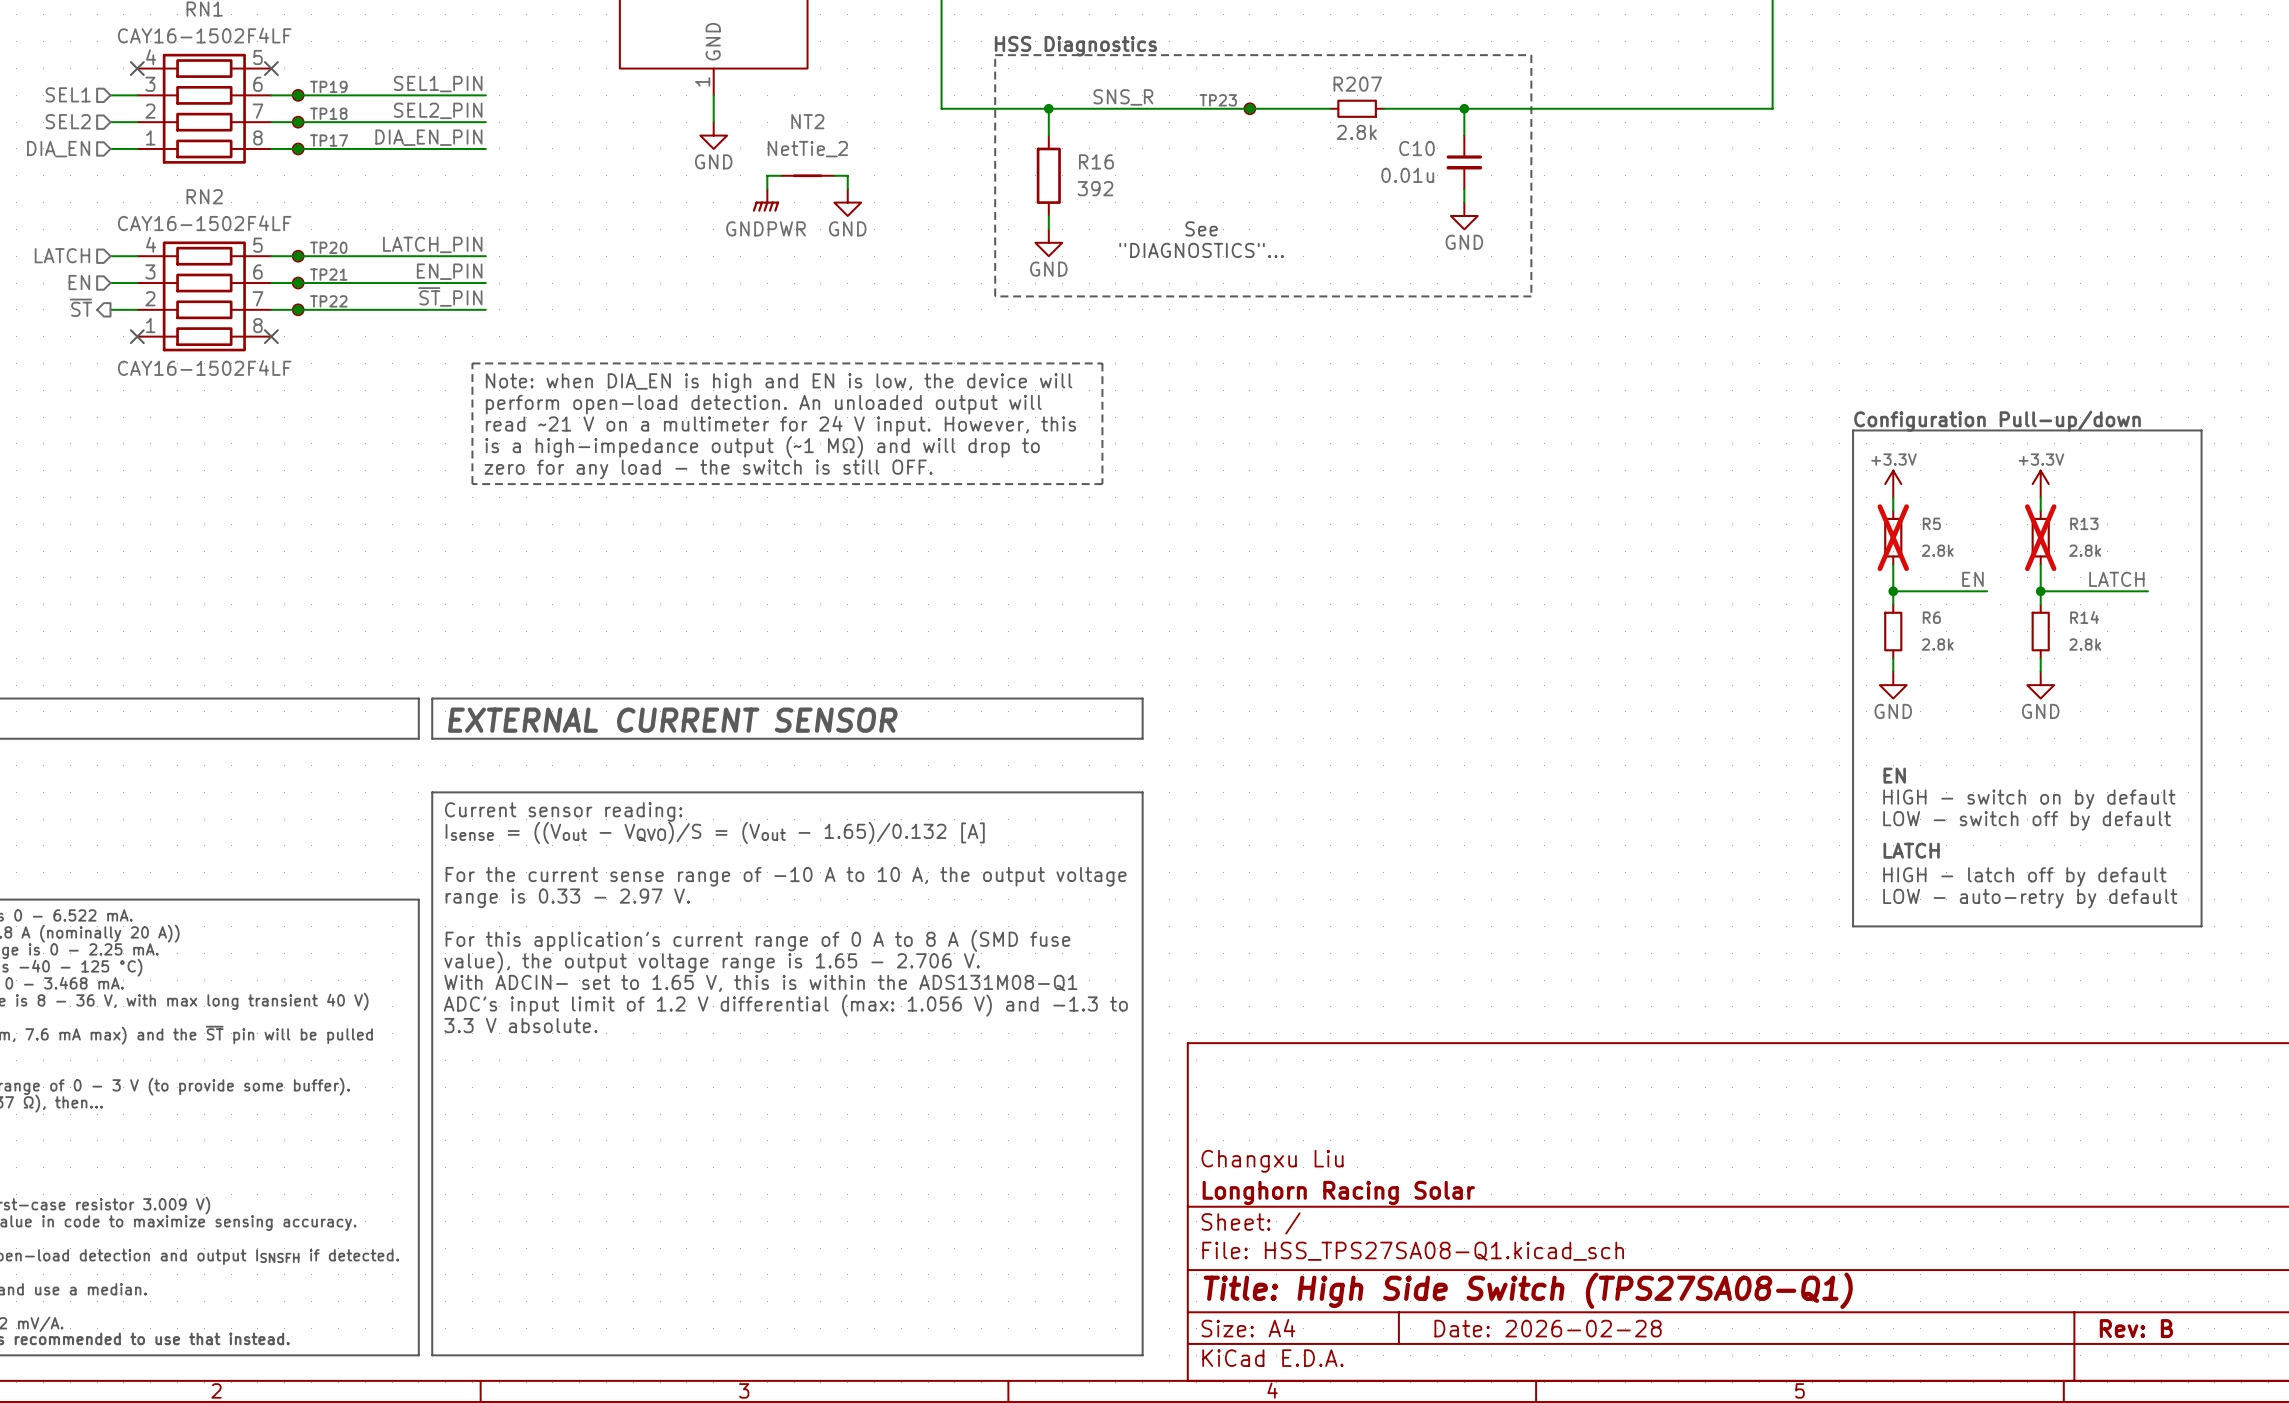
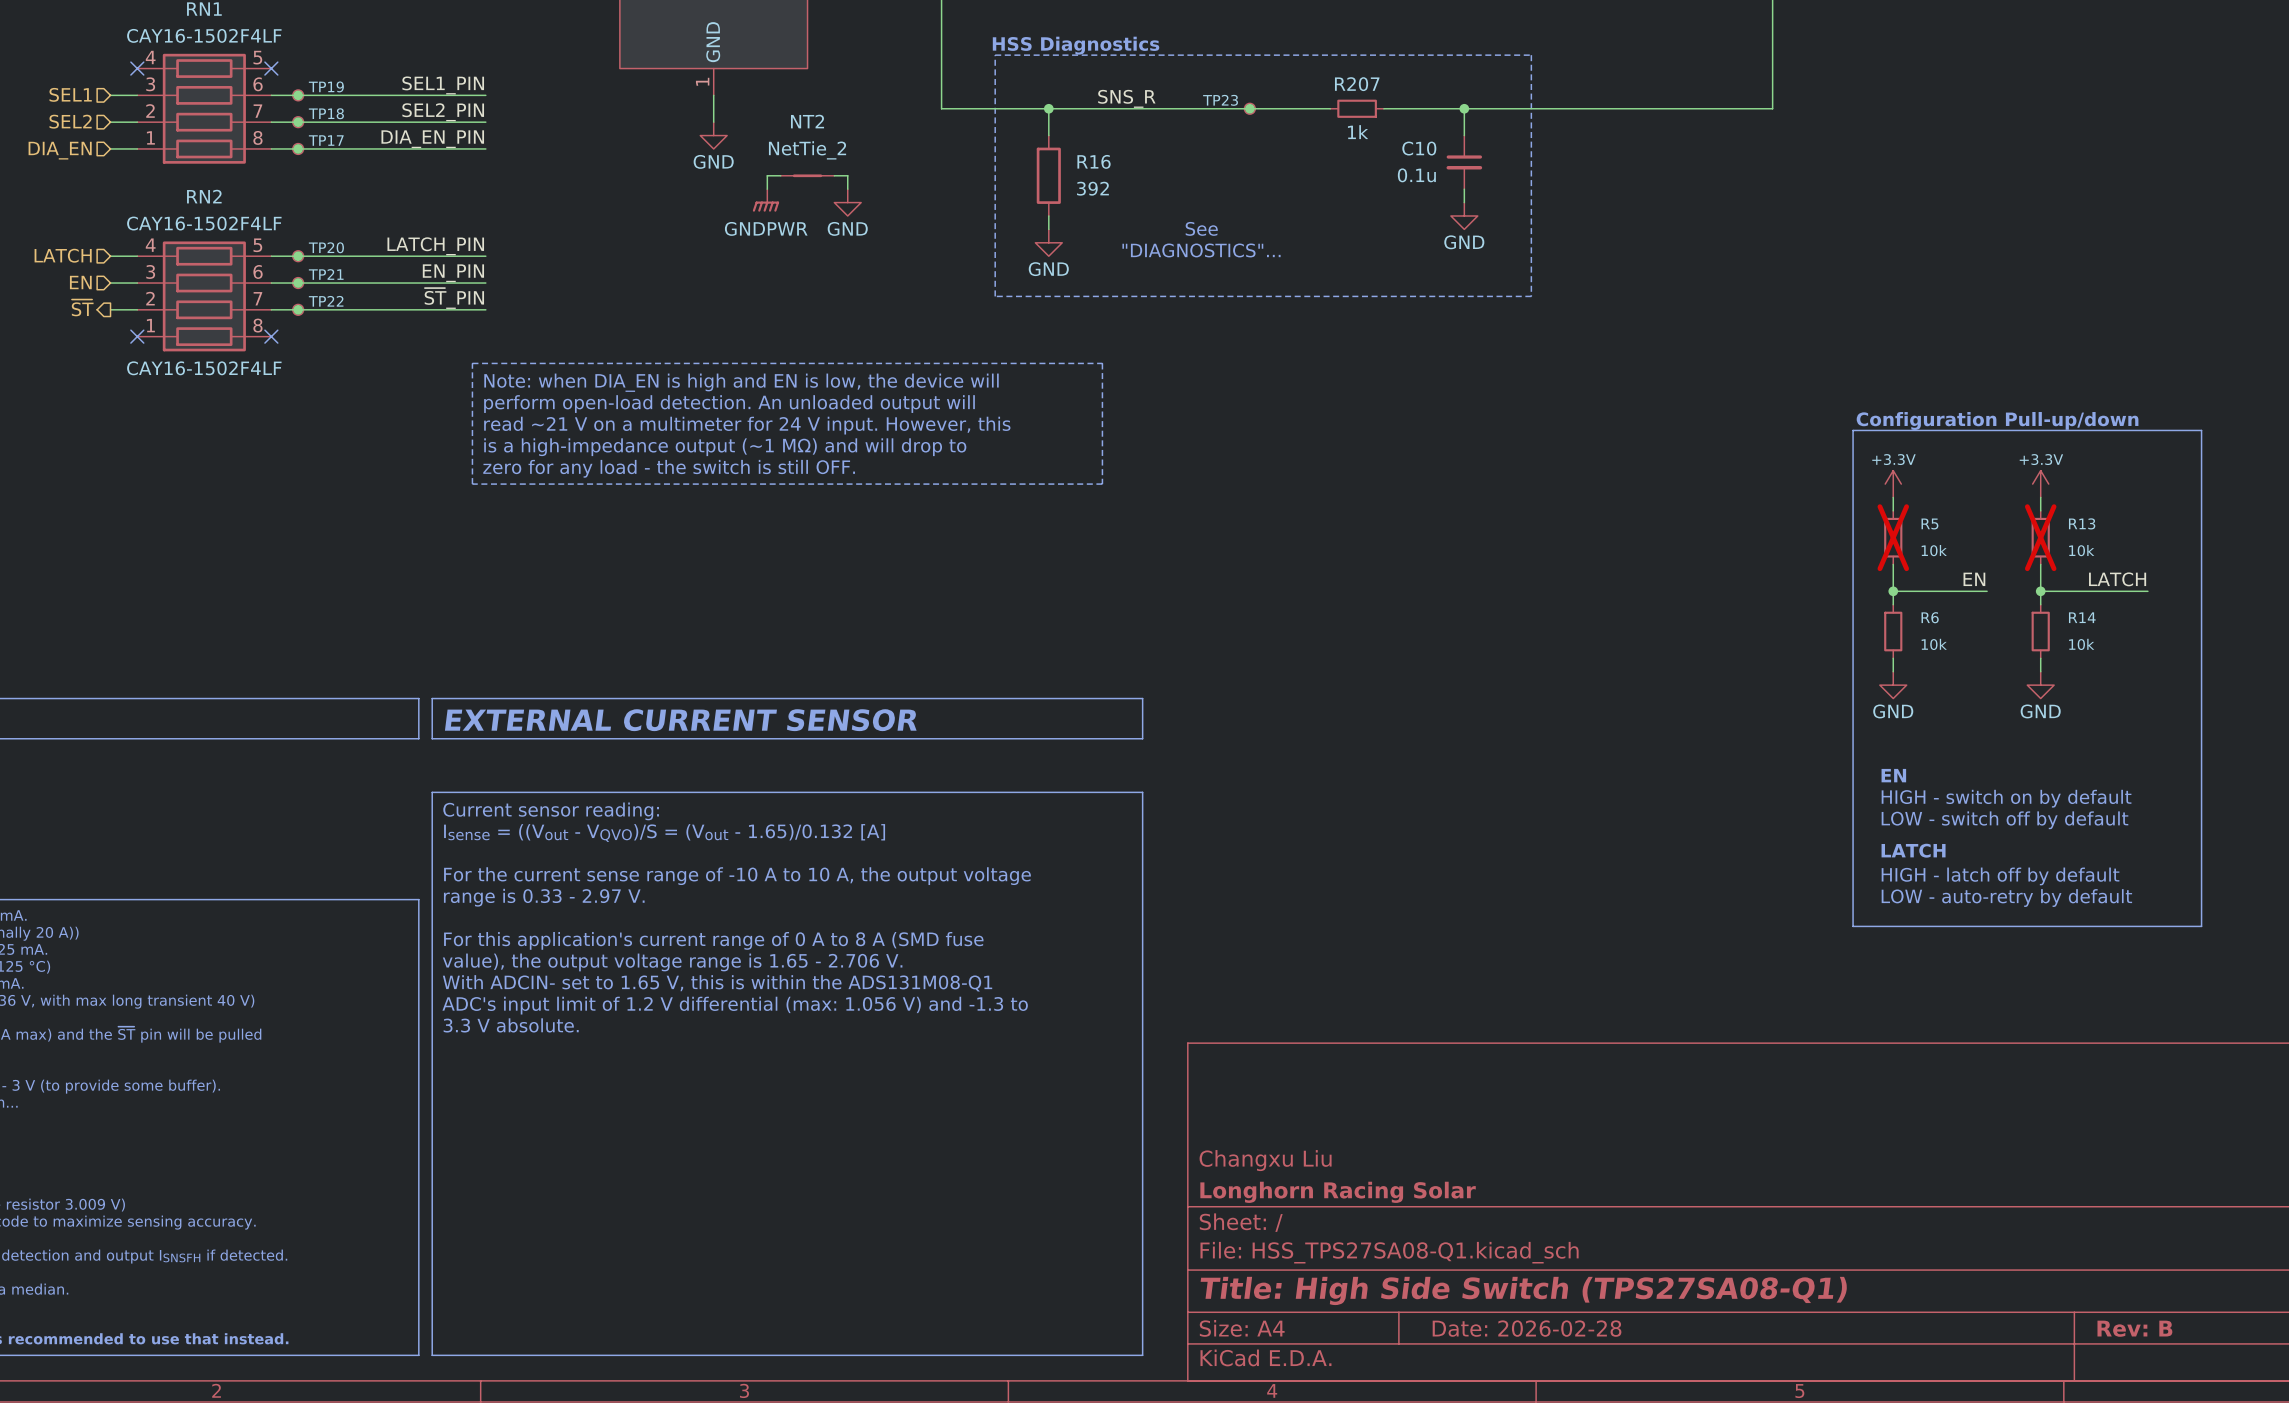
R207 value: 2.8k (1356, 132) -> 1k (1358, 132)
C10 value: 0.01u (1407, 175) -> 0.1u (1416, 175)
R5 value: 2.8k (1937, 550) -> 10k (1934, 550)
R13 value: 2.8k (2085, 550) -> 10k (2081, 550)
R6 value: 2.8k (1937, 644) -> 10k (1934, 644)
R14 value: 2.8k (2085, 644) -> 10k (2081, 644)

